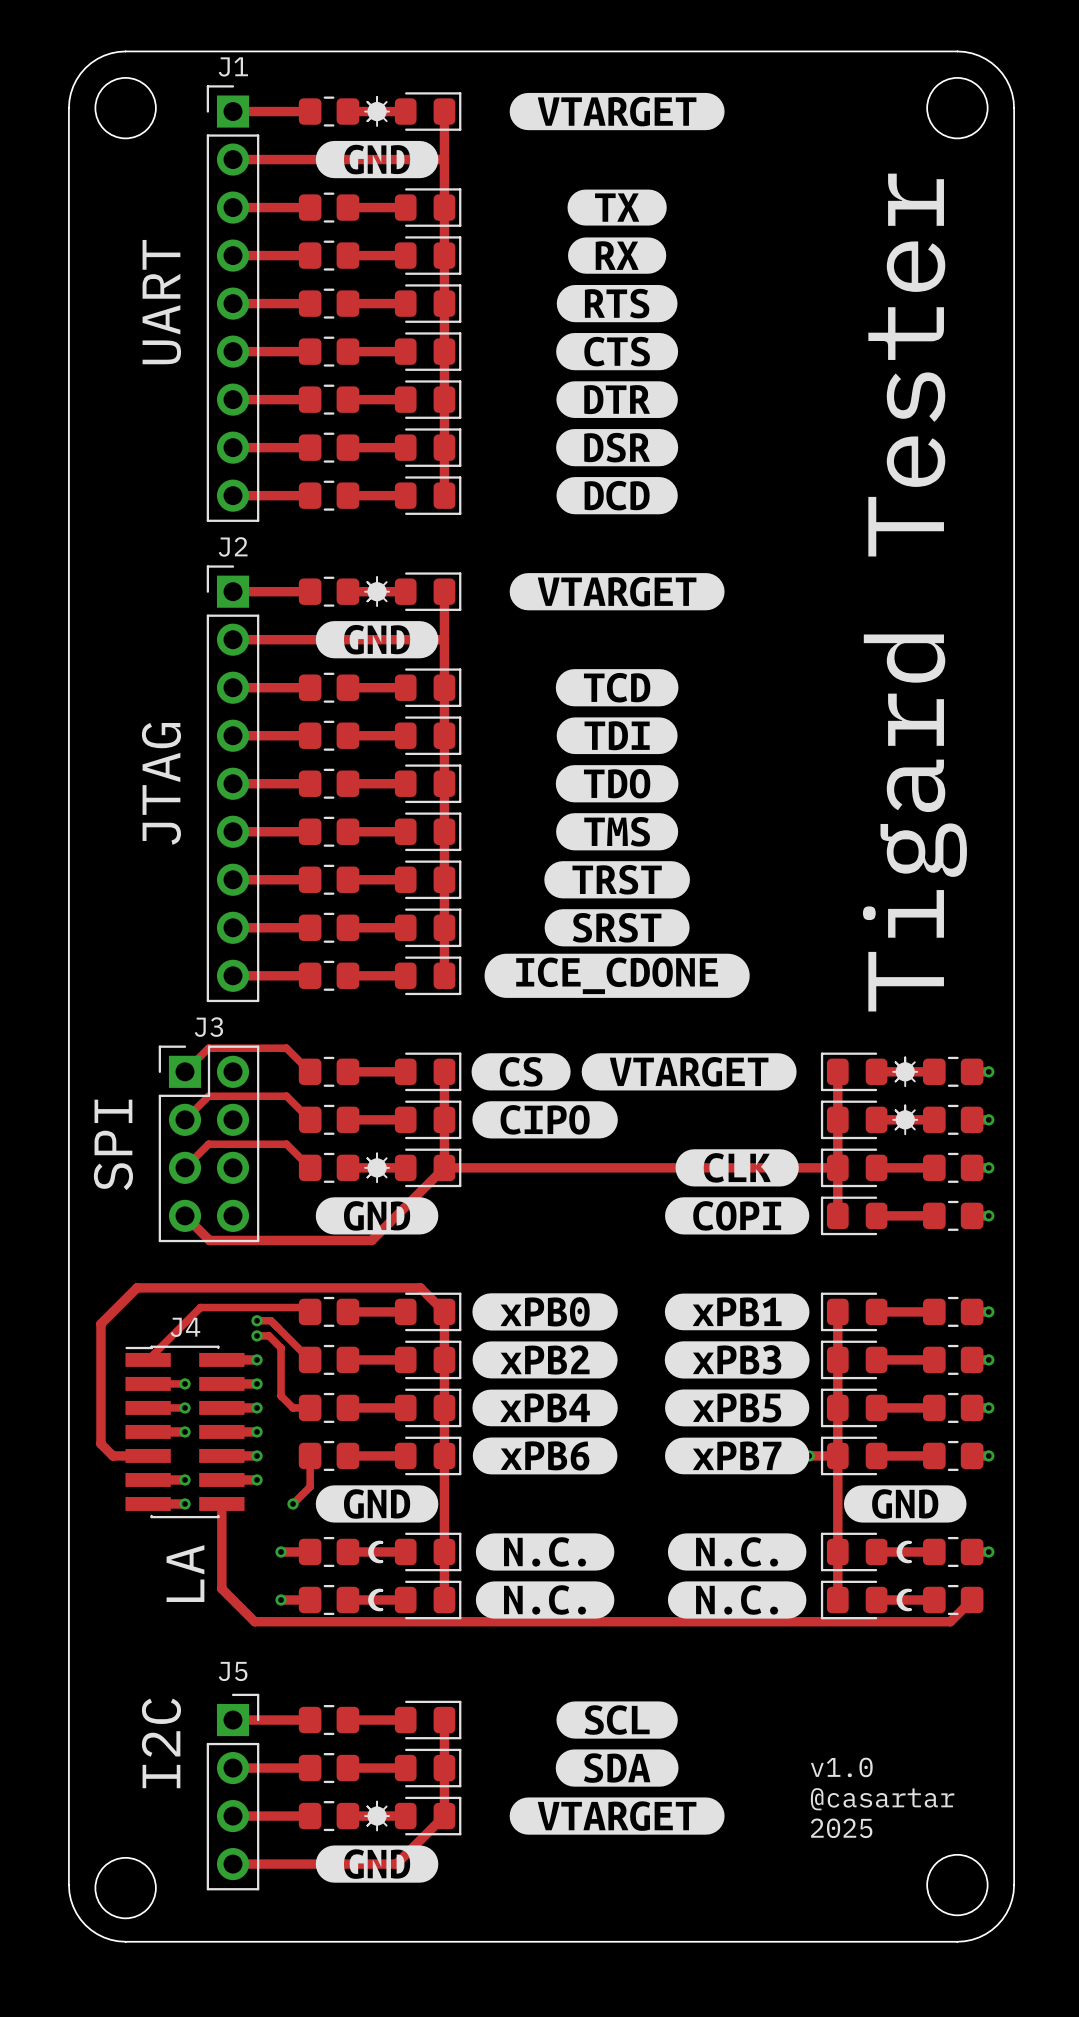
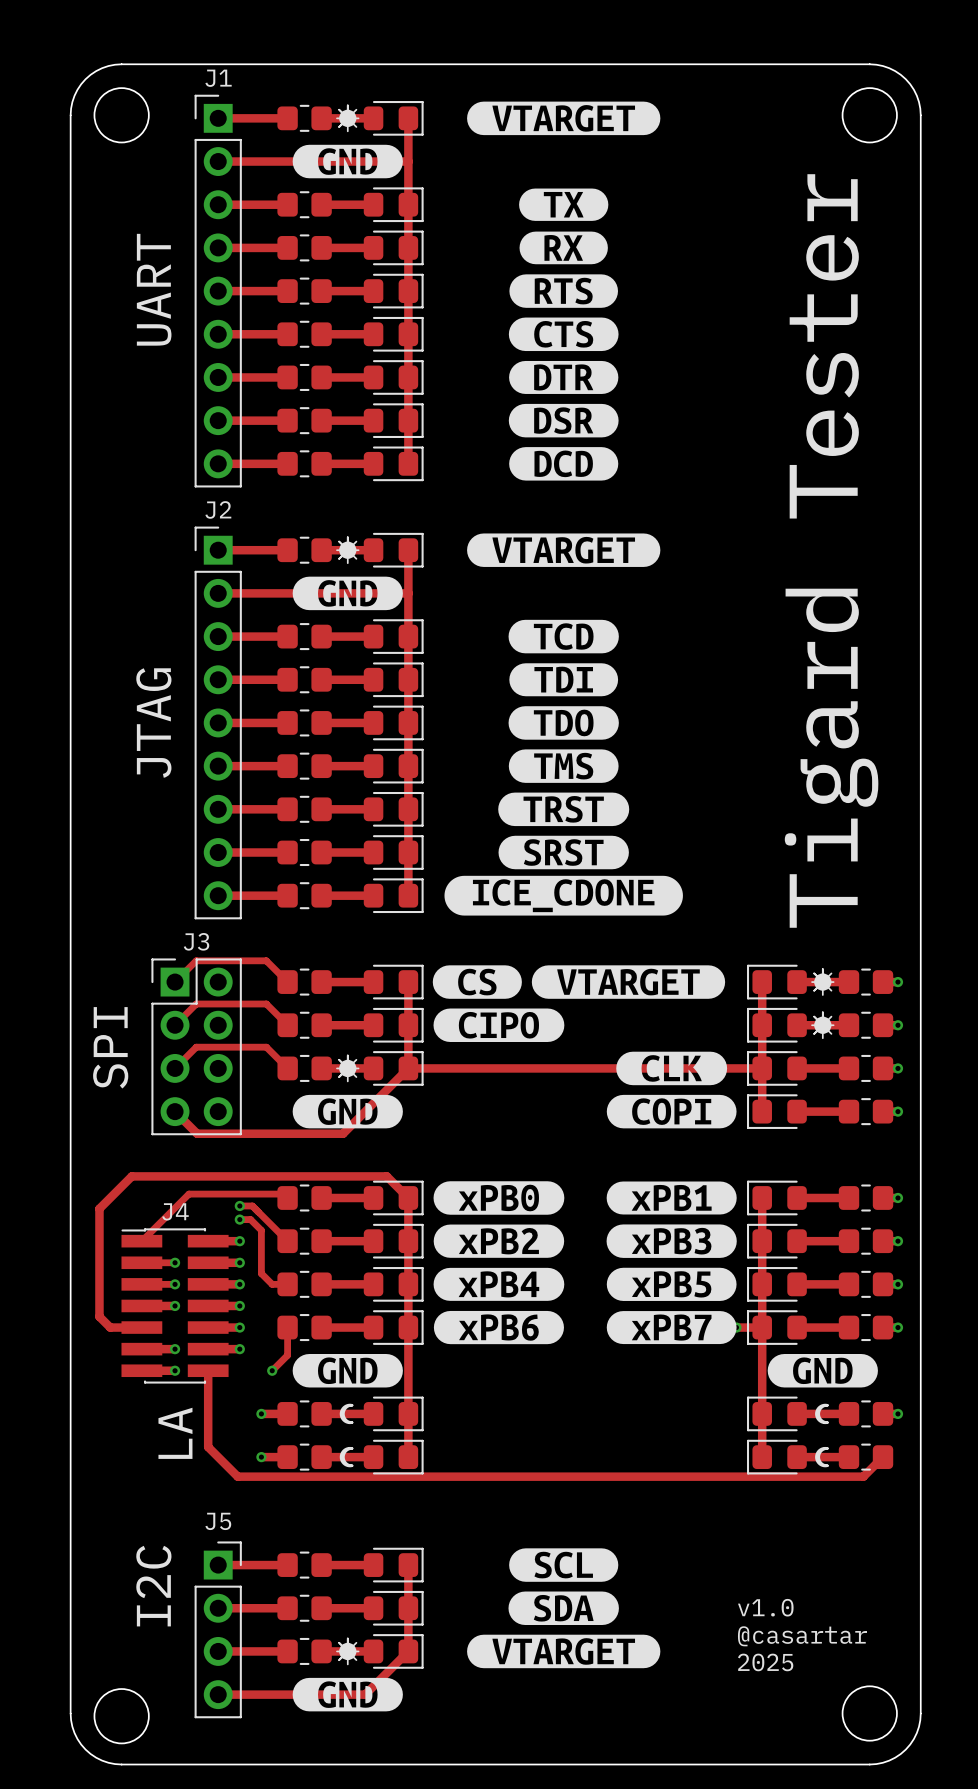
drawing: [475, 1533, 615, 1619] -> none
drawing: [667, 1533, 807, 1619] -> none

